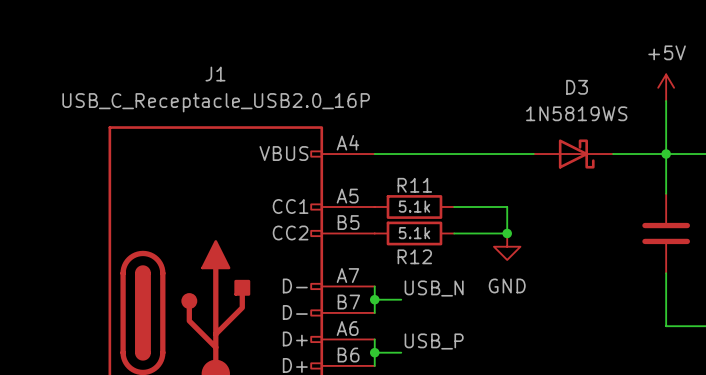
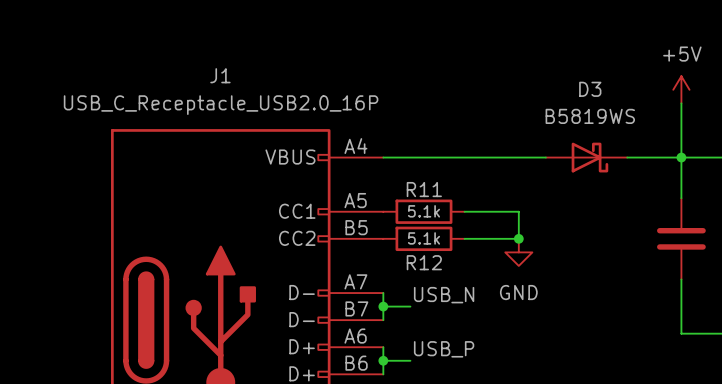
D3 value: 1N5819WS (576, 113) -> B5819WS (590, 116)

